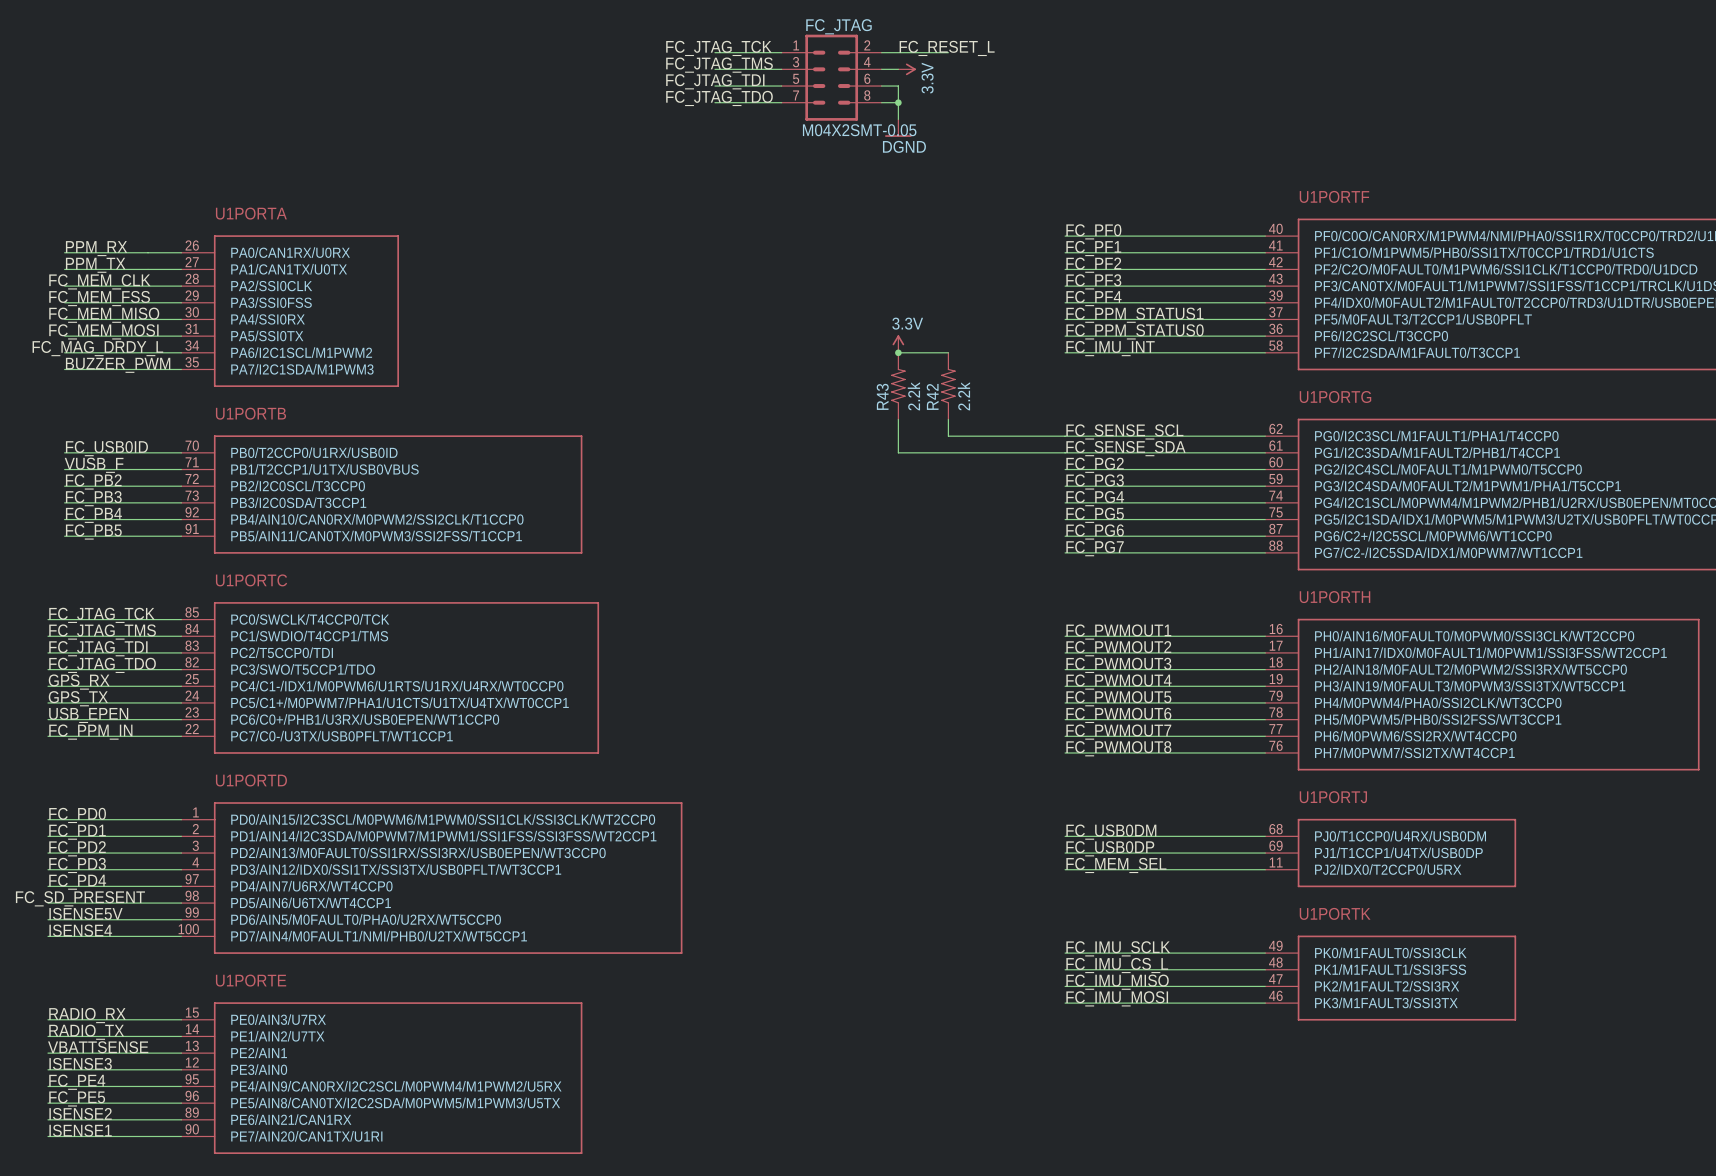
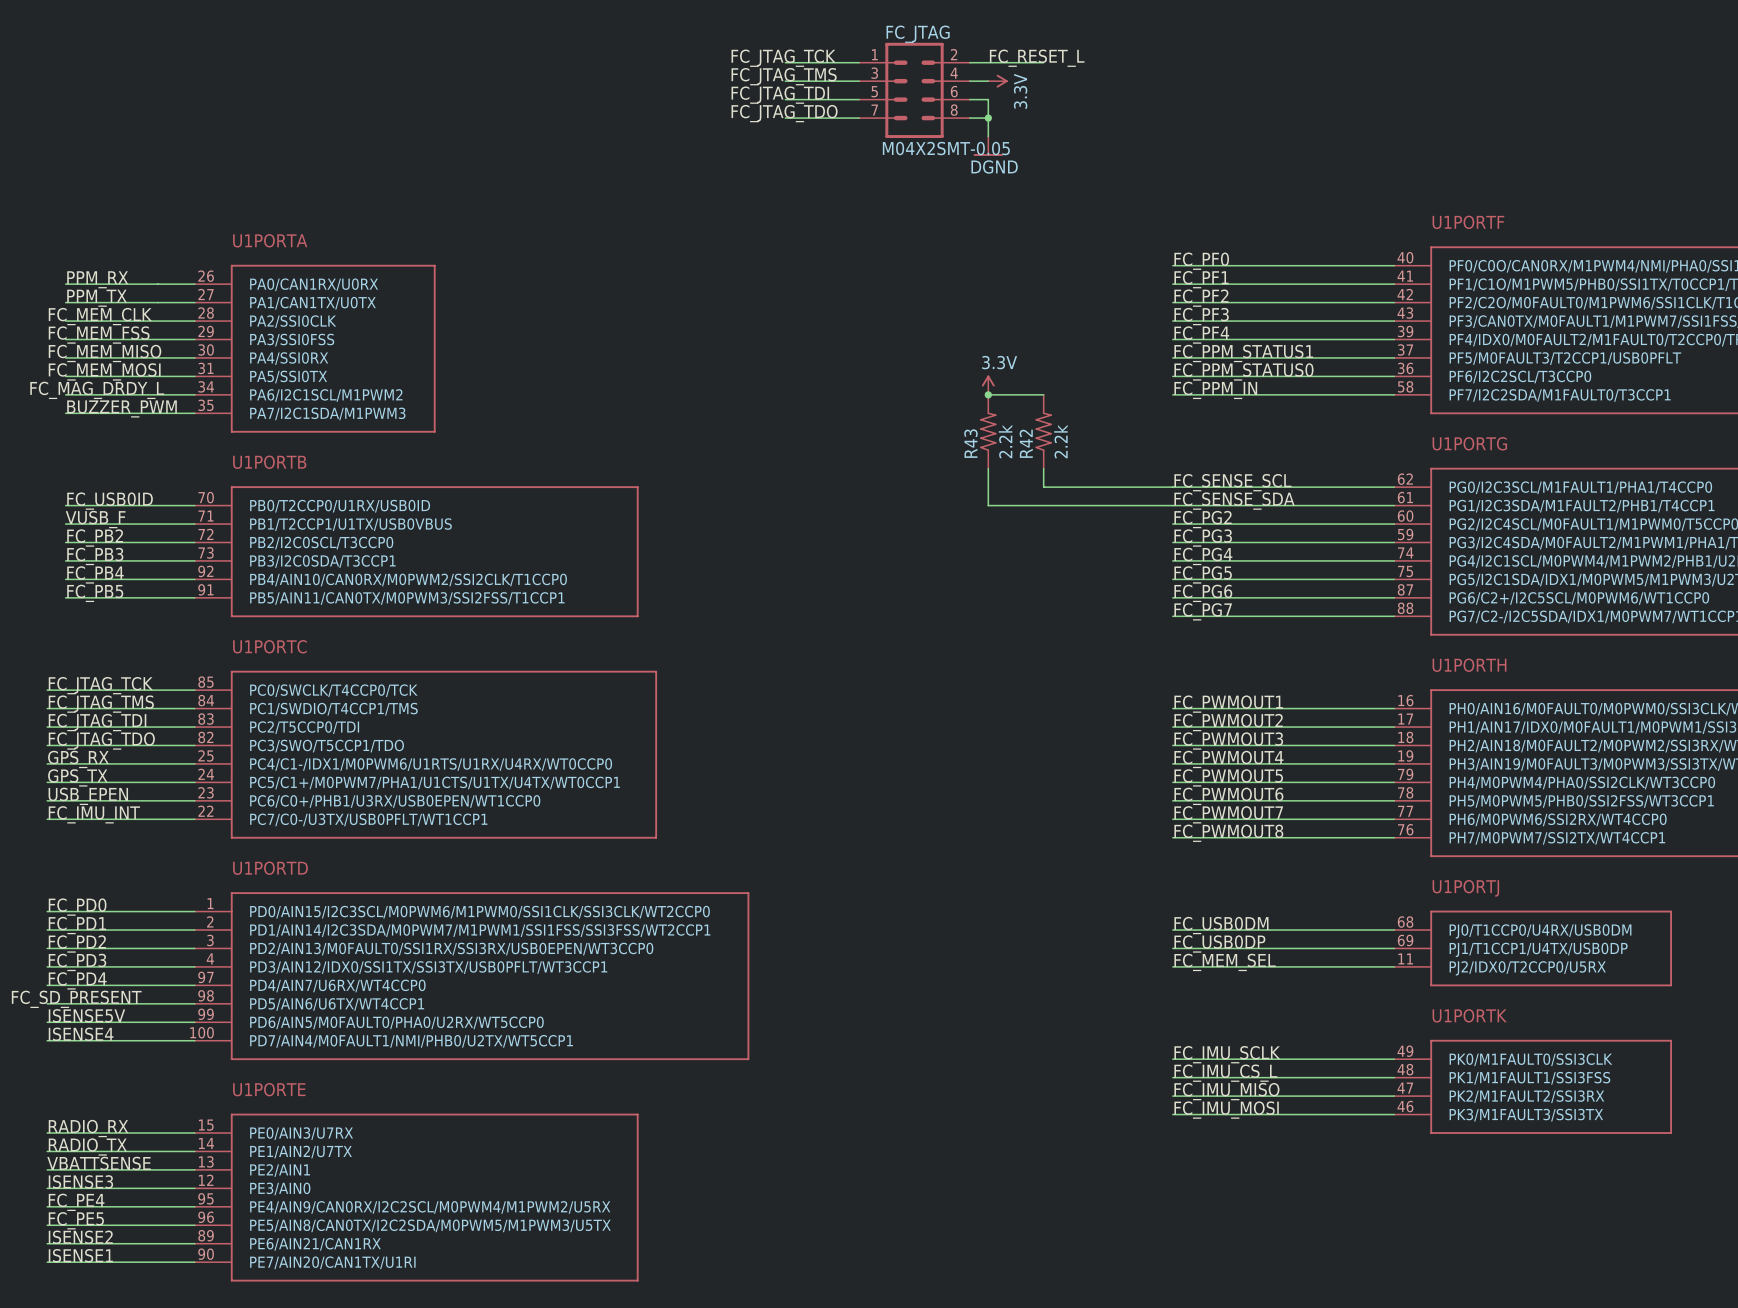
label: FC_IMU_INT (1110, 348) -> FC_PPM_IN (1215, 390)
label: FC_PPM_IN (90, 732) -> FC_IMU_INT (94, 814)

